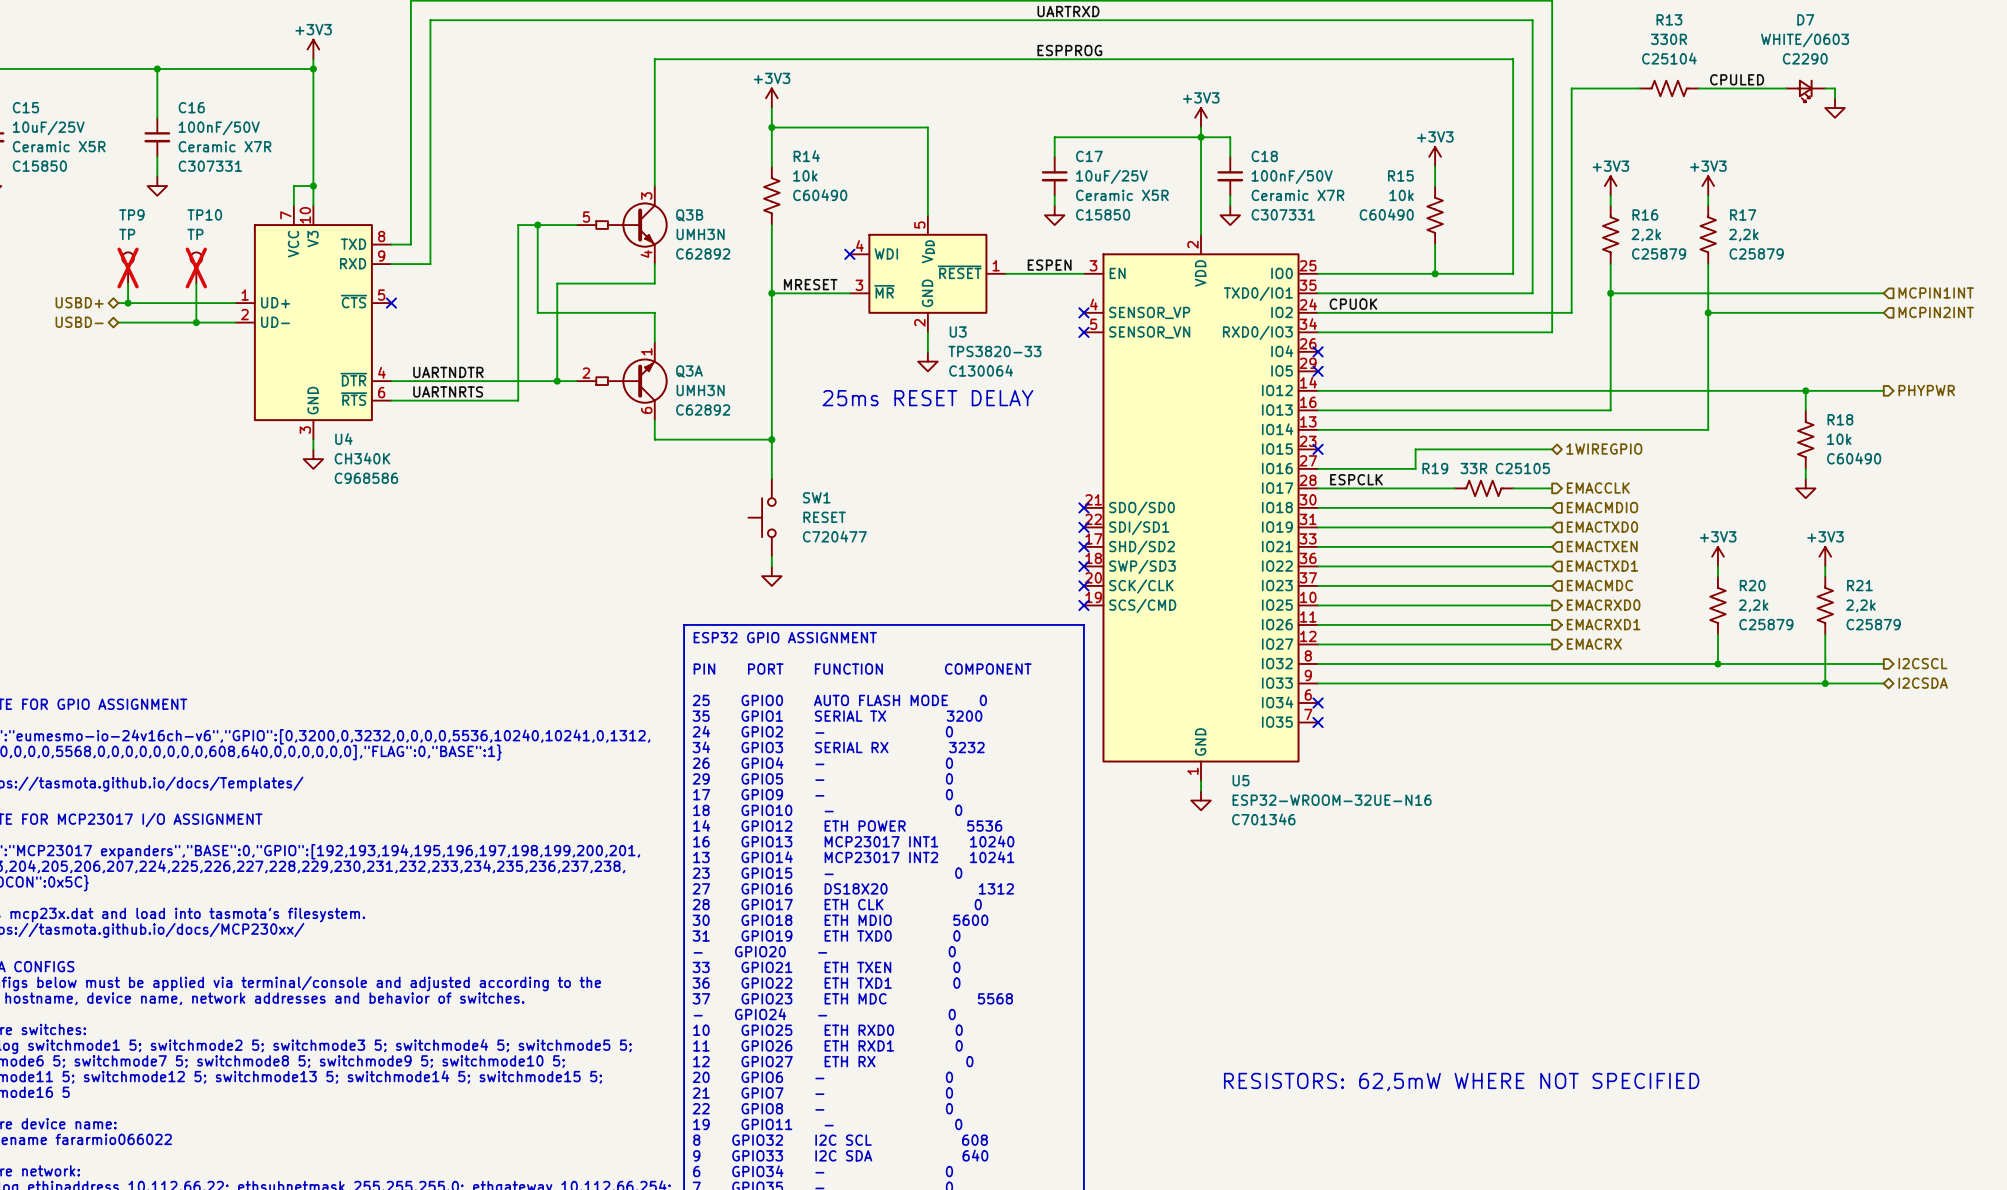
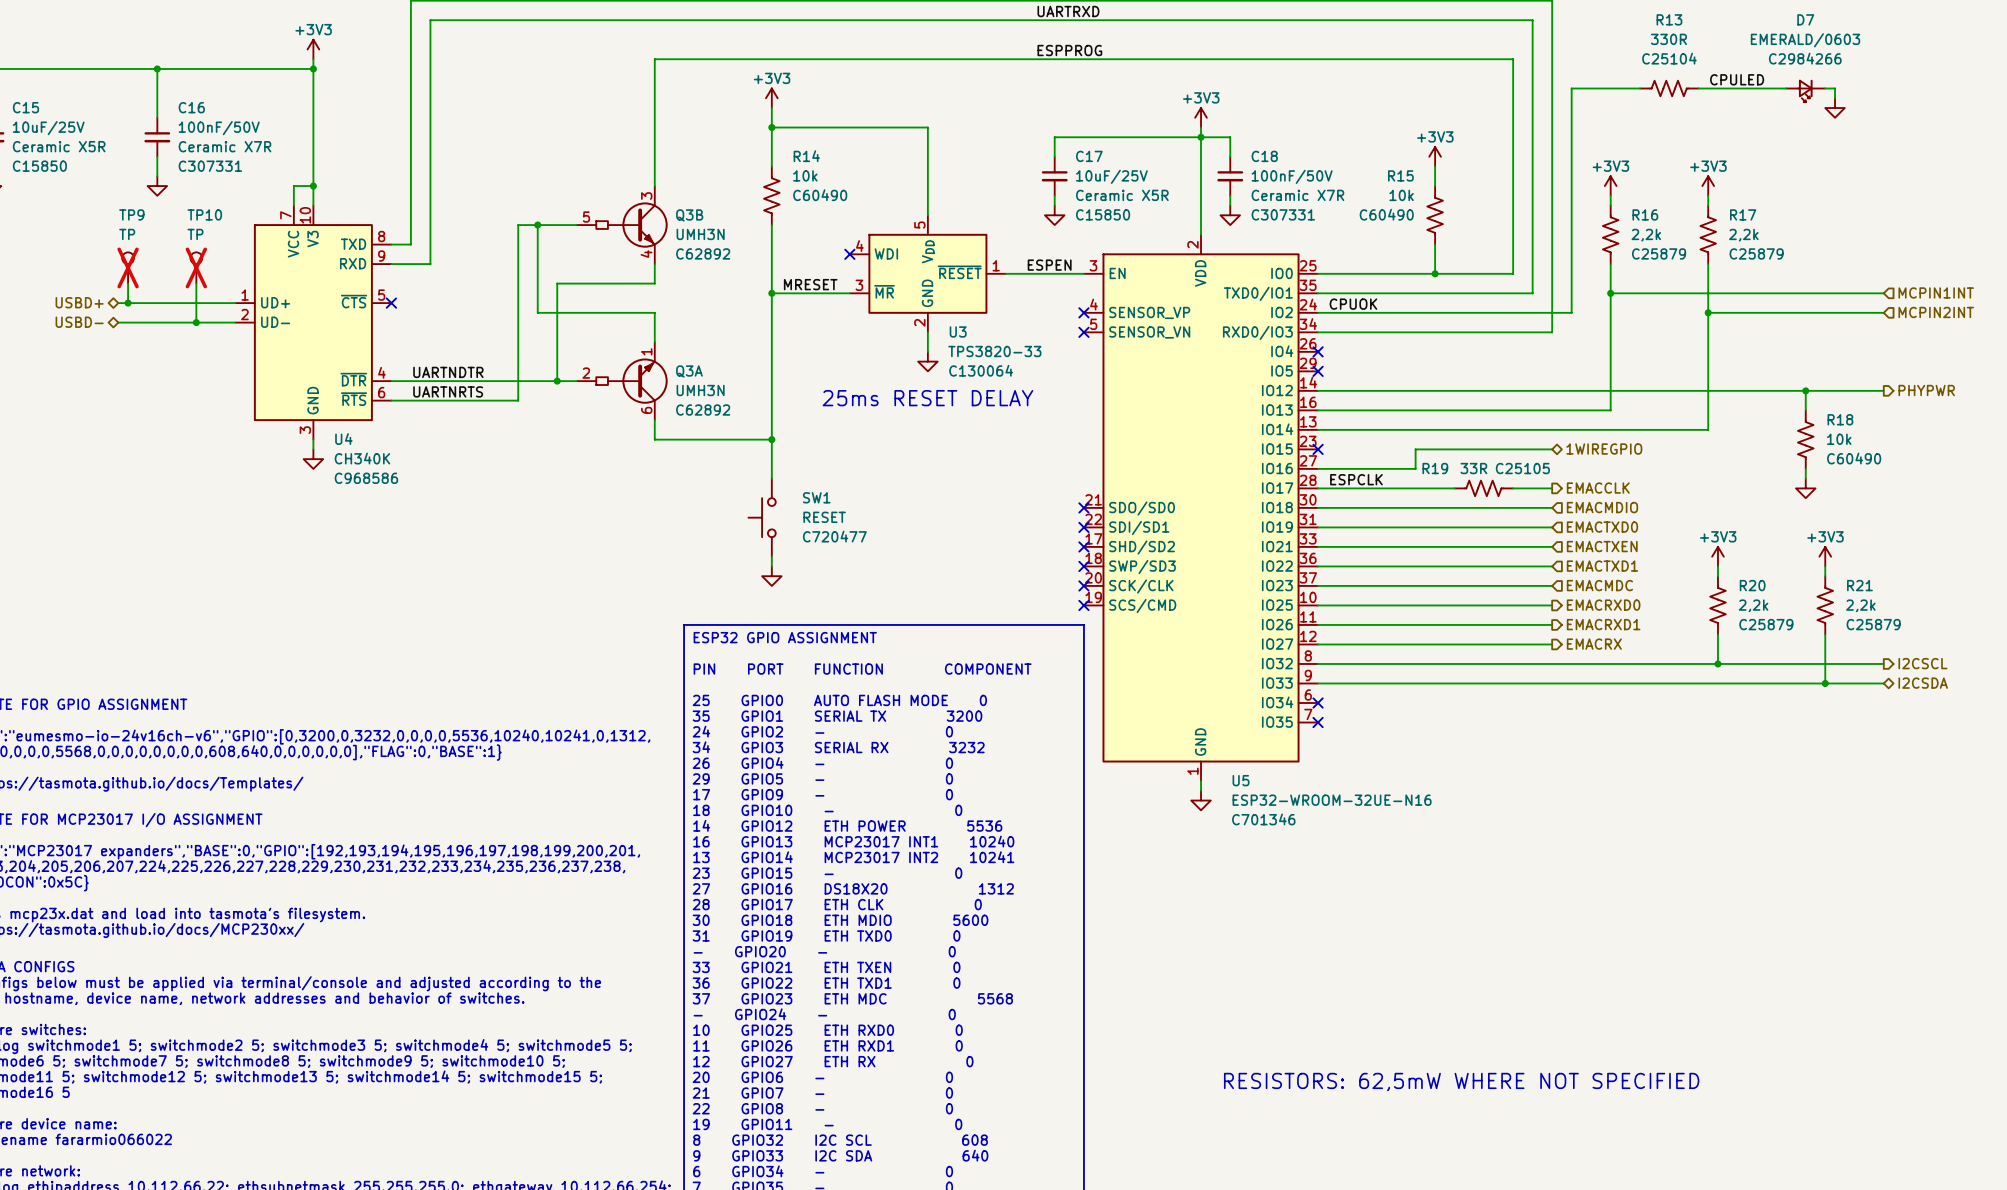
D7 value: WHITE/0603 (1805, 40) -> EMERALD/0603 (1805, 40)
D7 text: C2290 (1805, 58) -> C2984266 (1805, 58)

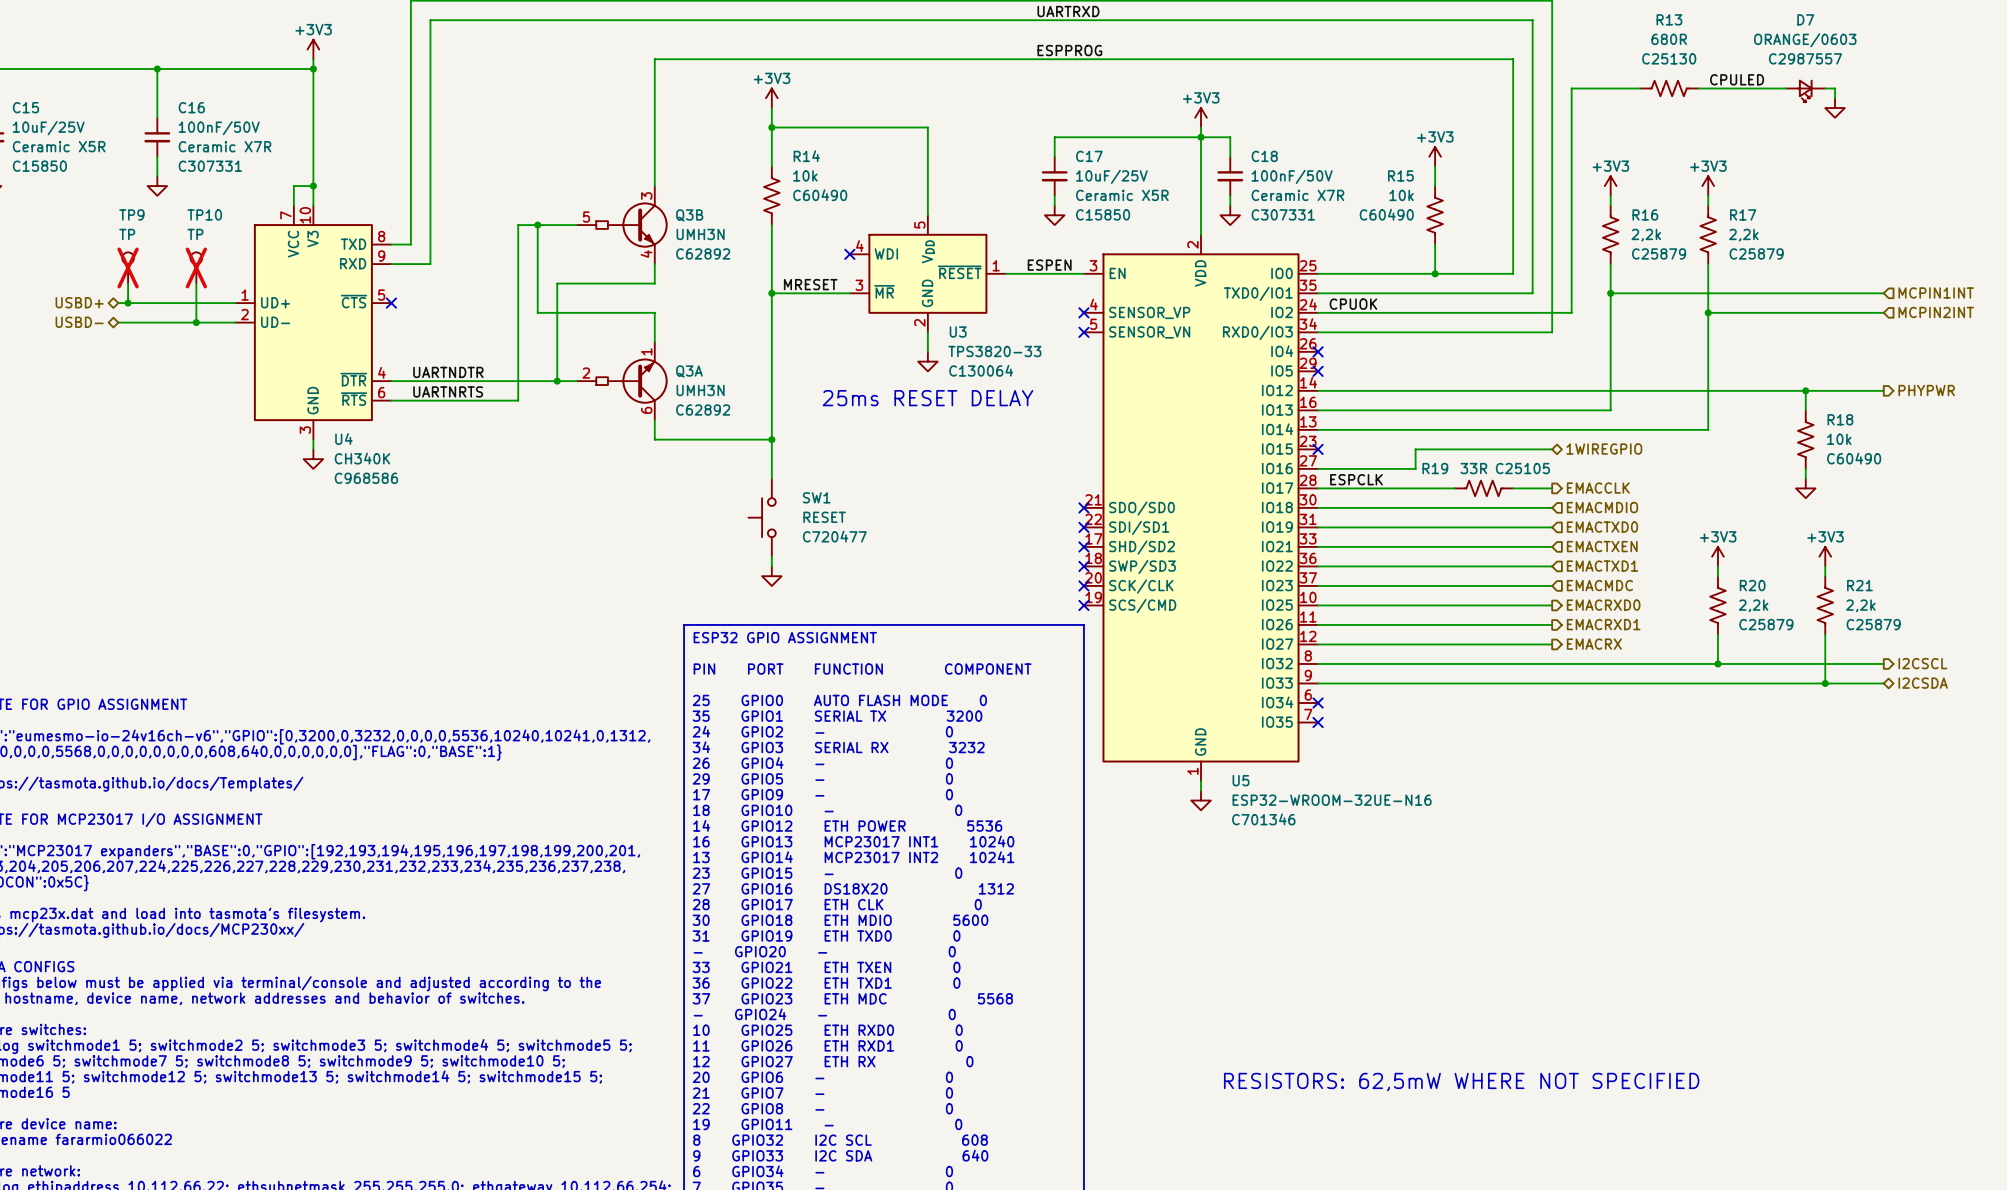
R13 value: 330R (1668, 39) -> 680R (1669, 39)
D7 value: EMERALD/0603 (1805, 40) -> ORANGE/0603 (1805, 40)
R13 text: C25104 (1669, 58) -> C25130 (1669, 58)
D7 text: C2984266 (1805, 58) -> C2987557 (1805, 58)

